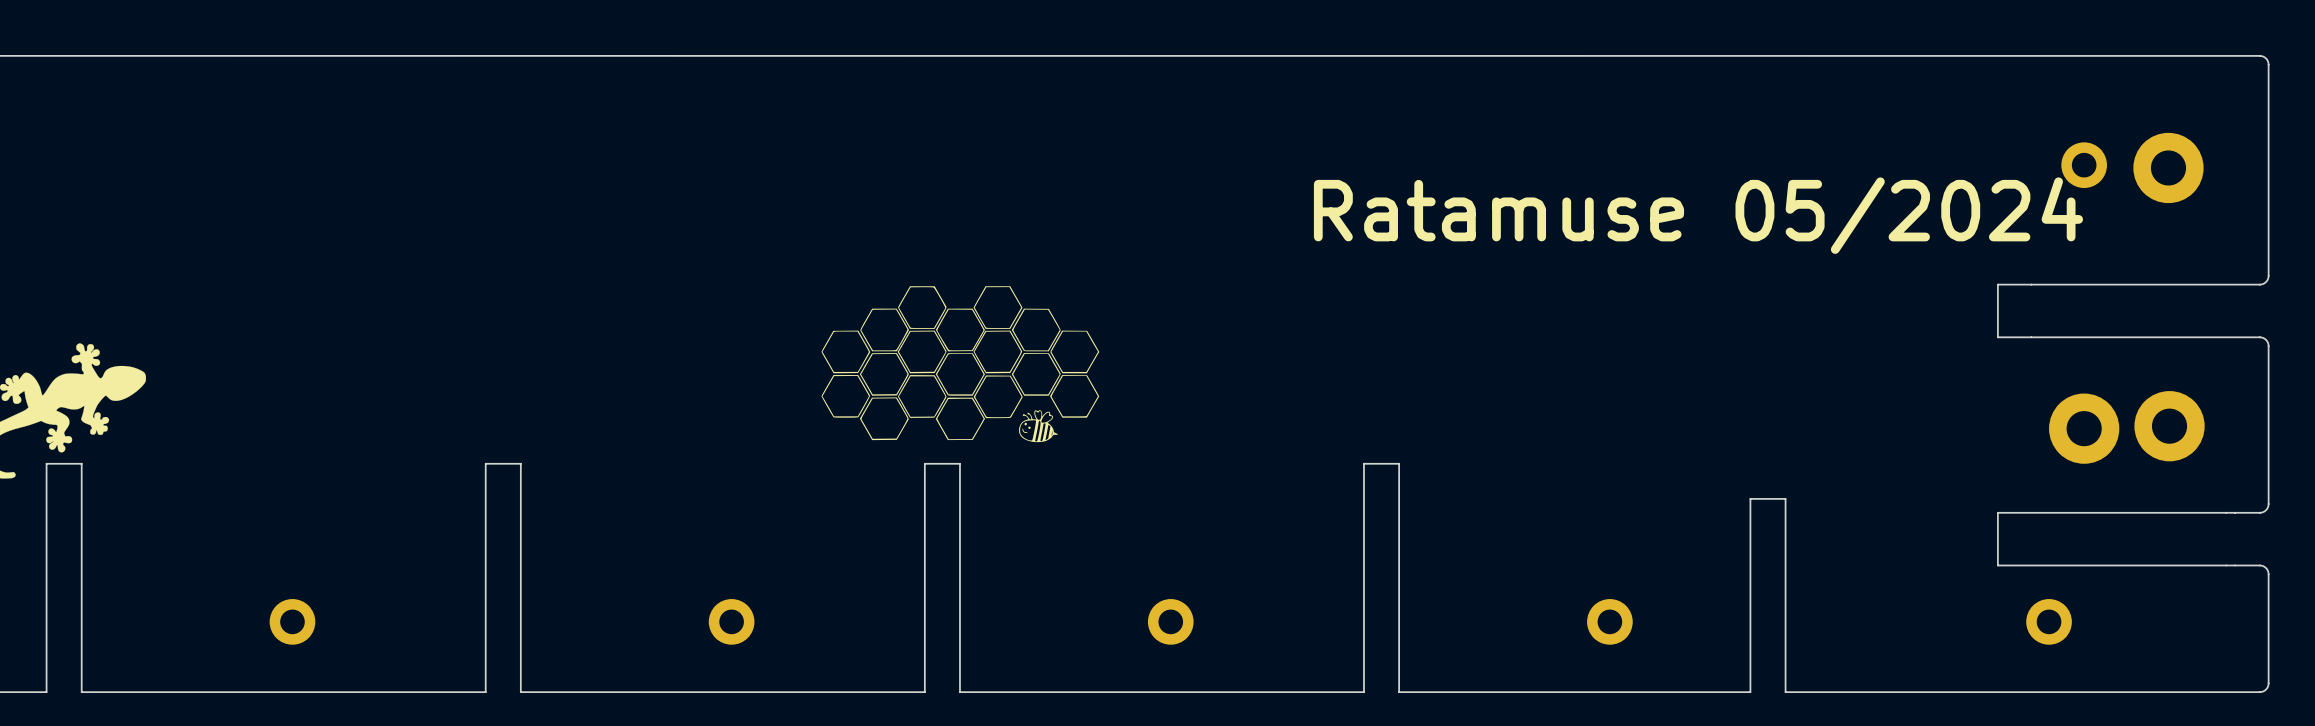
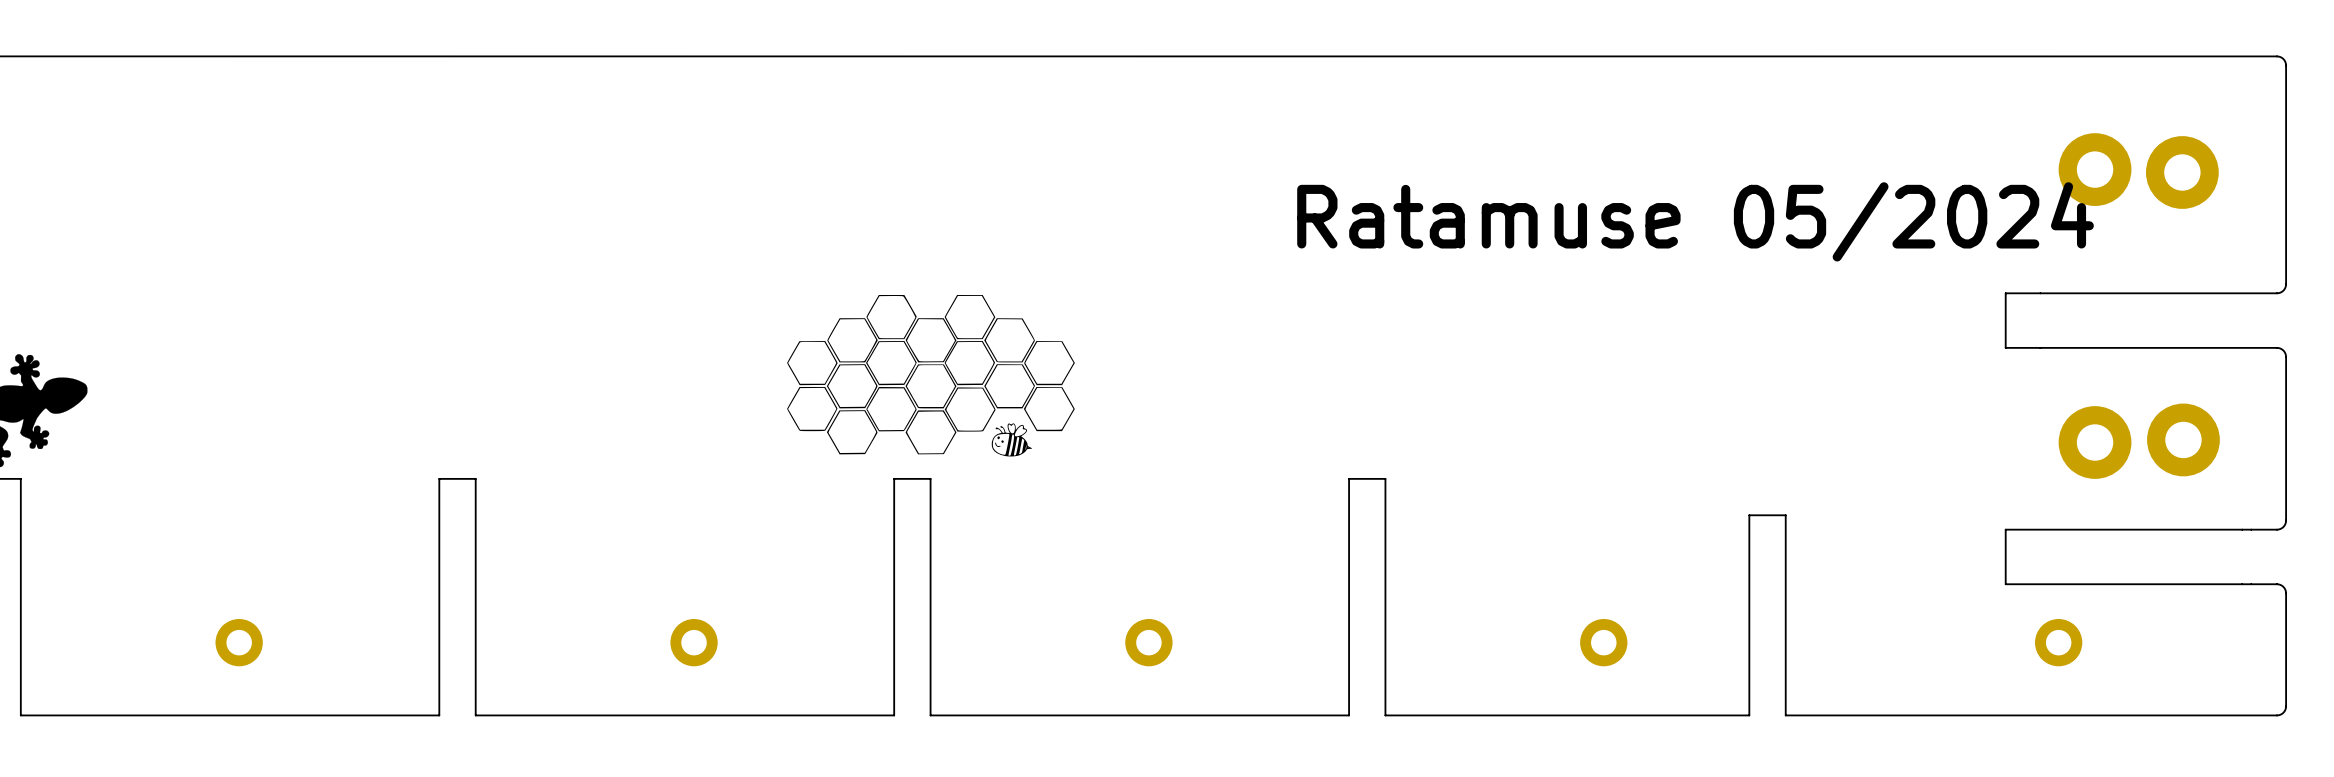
part footprint: [2061, 142, 2108, 189] -> [2058, 133, 2132, 206]

